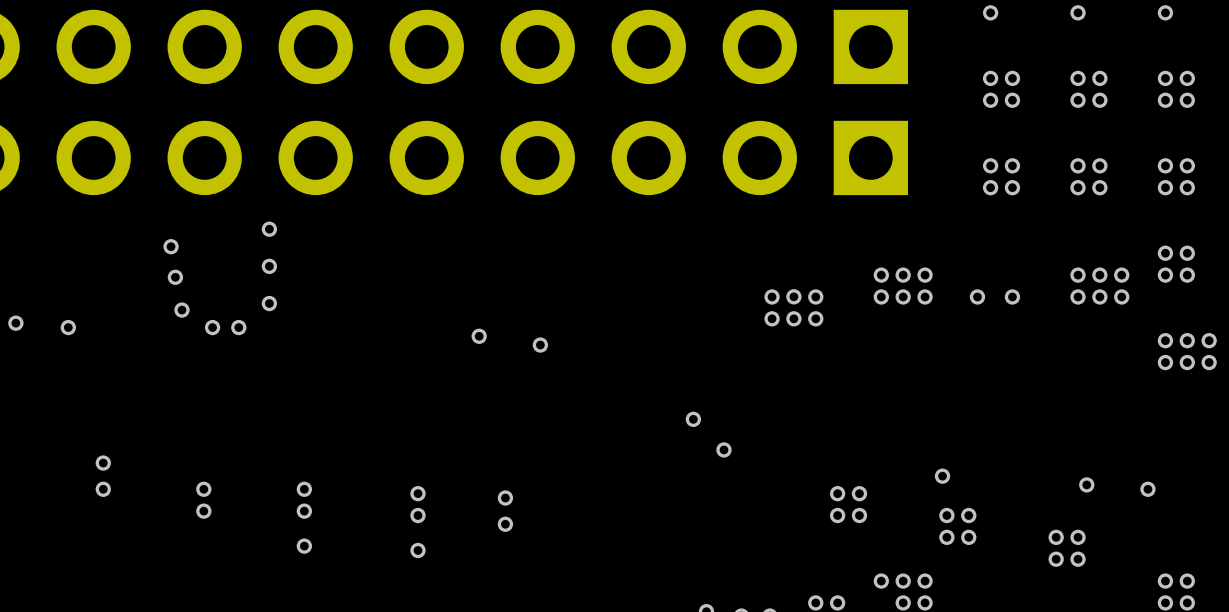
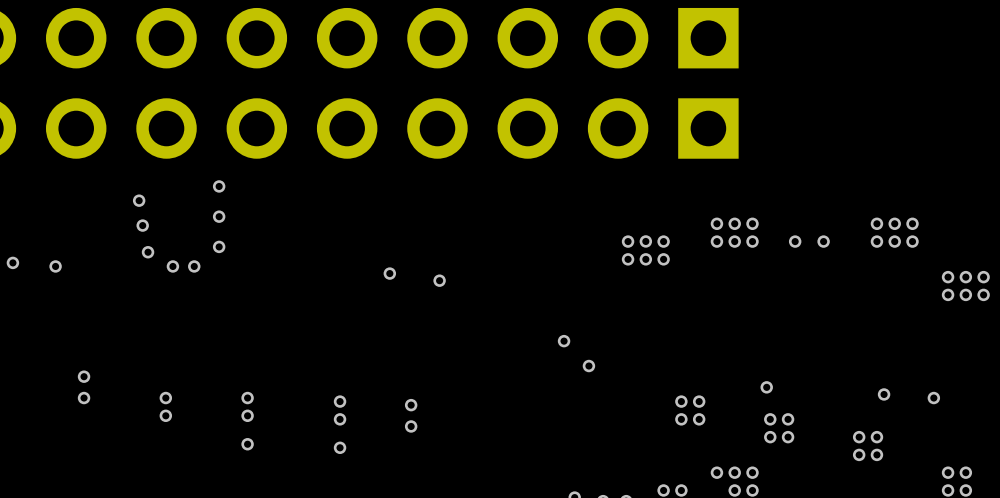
via: (990, 12) -> none
via: (1078, 12) -> none
via: (1165, 12) -> none
via: (990, 78) -> none
via: (1012, 78) -> none
via: (1078, 78) -> none
via: (1099, 78) -> none
via: (1165, 78) -> none
via: (1187, 78) -> none
via: (990, 100) -> none
via: (1012, 100) -> none
via: (1078, 100) -> none
via: (1099, 100) -> none
via: (1165, 100) -> none
via: (1187, 100) -> none
via: (990, 165) -> none
via: (1012, 165) -> none
via: (1078, 165) -> none
via: (1099, 165) -> none
via: (1165, 165) -> none
via: (1187, 165) -> none
via: (990, 187) -> none
via: (1012, 187) -> none
via: (1078, 187) -> none
via: (1099, 187) -> none
via: (1165, 187) -> none
via: (1187, 187) -> none
via: (1165, 253) -> none
via: (1187, 253) -> none
via: (1165, 275) -> none
via: (1187, 275) -> none

